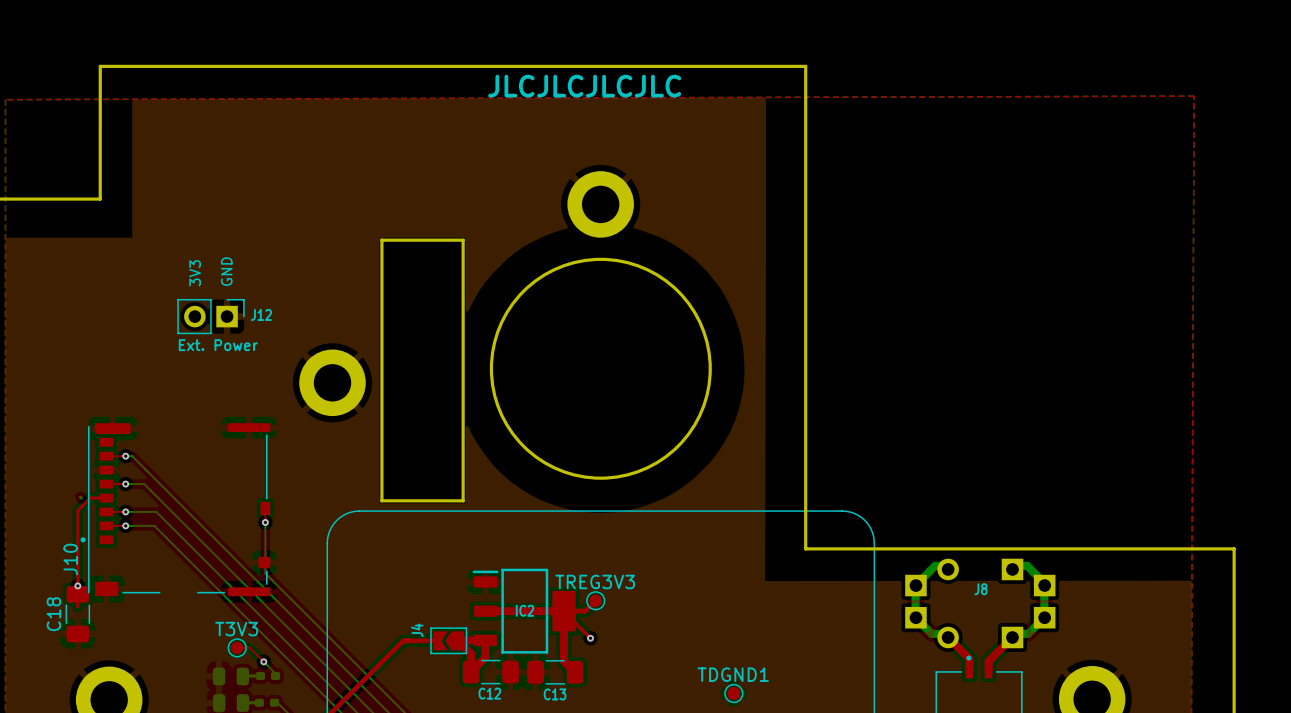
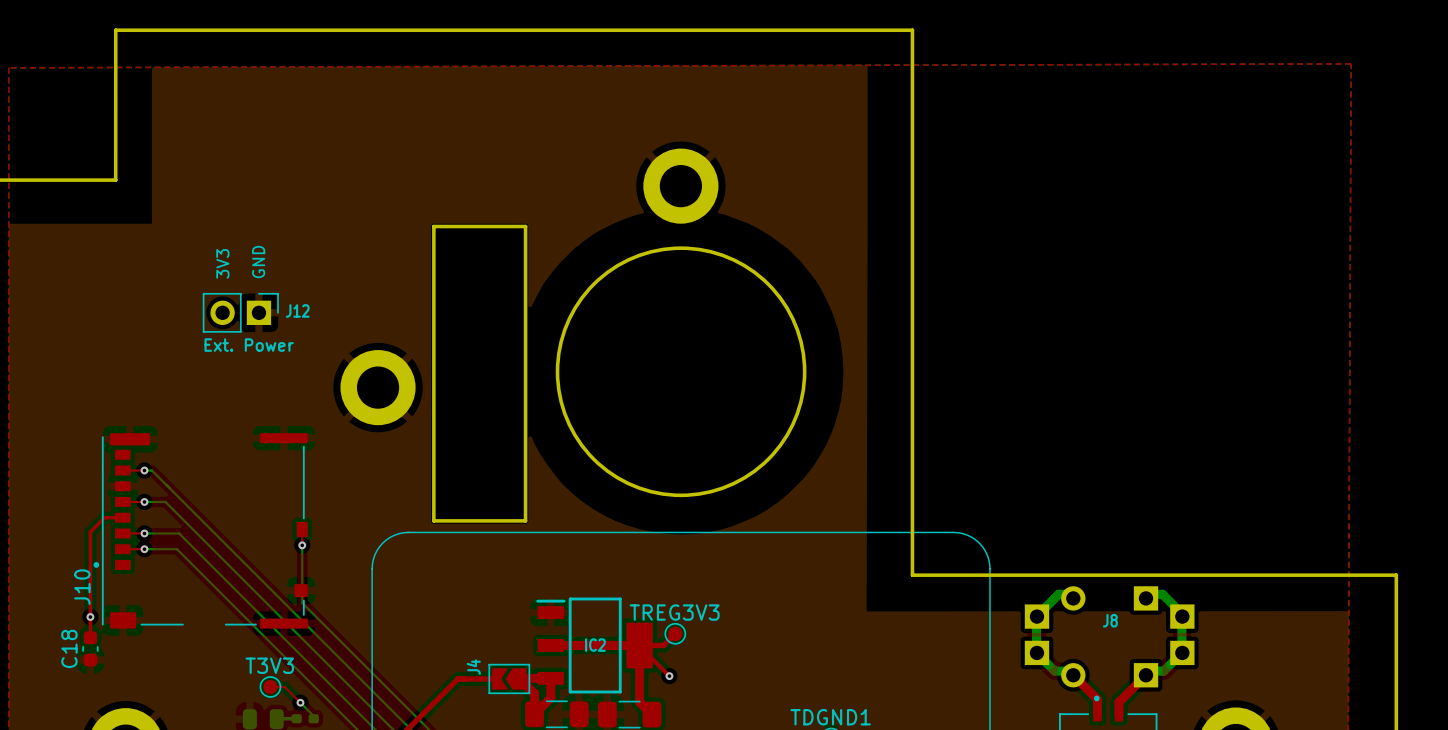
text: JLCJLCJLCJLC (584, 86) -> none
bottom track: (80, 497) (81, 498) -> none
C18 footprint: [65, 586, 91, 643] -> [82, 631, 99, 667]

